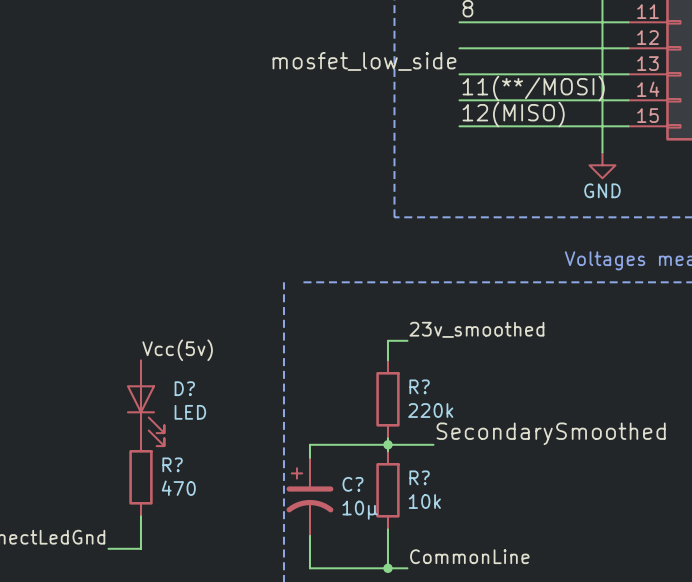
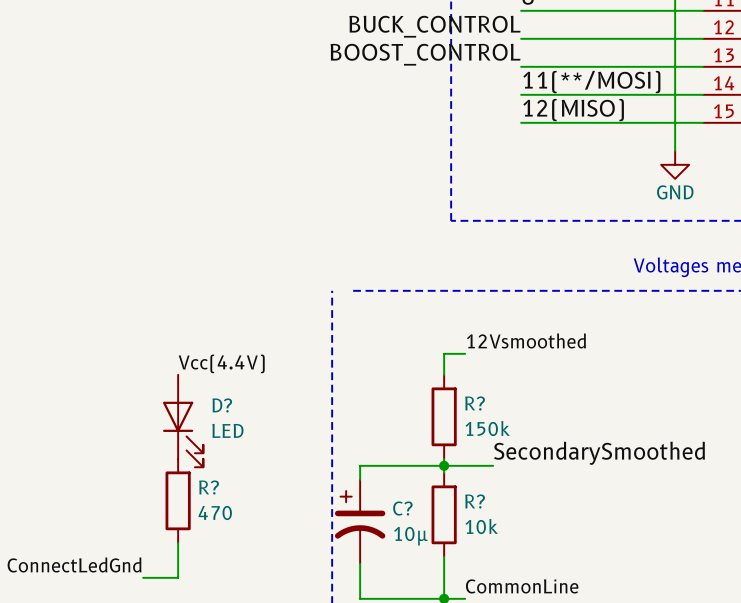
label: none -> BUCK_CONTROL (434, 26)
label: mosfet_low_side (364, 61) -> BOOST_CONTROL (425, 54)
label: 23v_smoothed (476, 329) -> 12Vsmoothed (526, 340)
label: Vcc(5v) (177, 350) -> Vcc(4.4V) (221, 363)
R? value: 220k (430, 410) -> 150k (487, 428)

